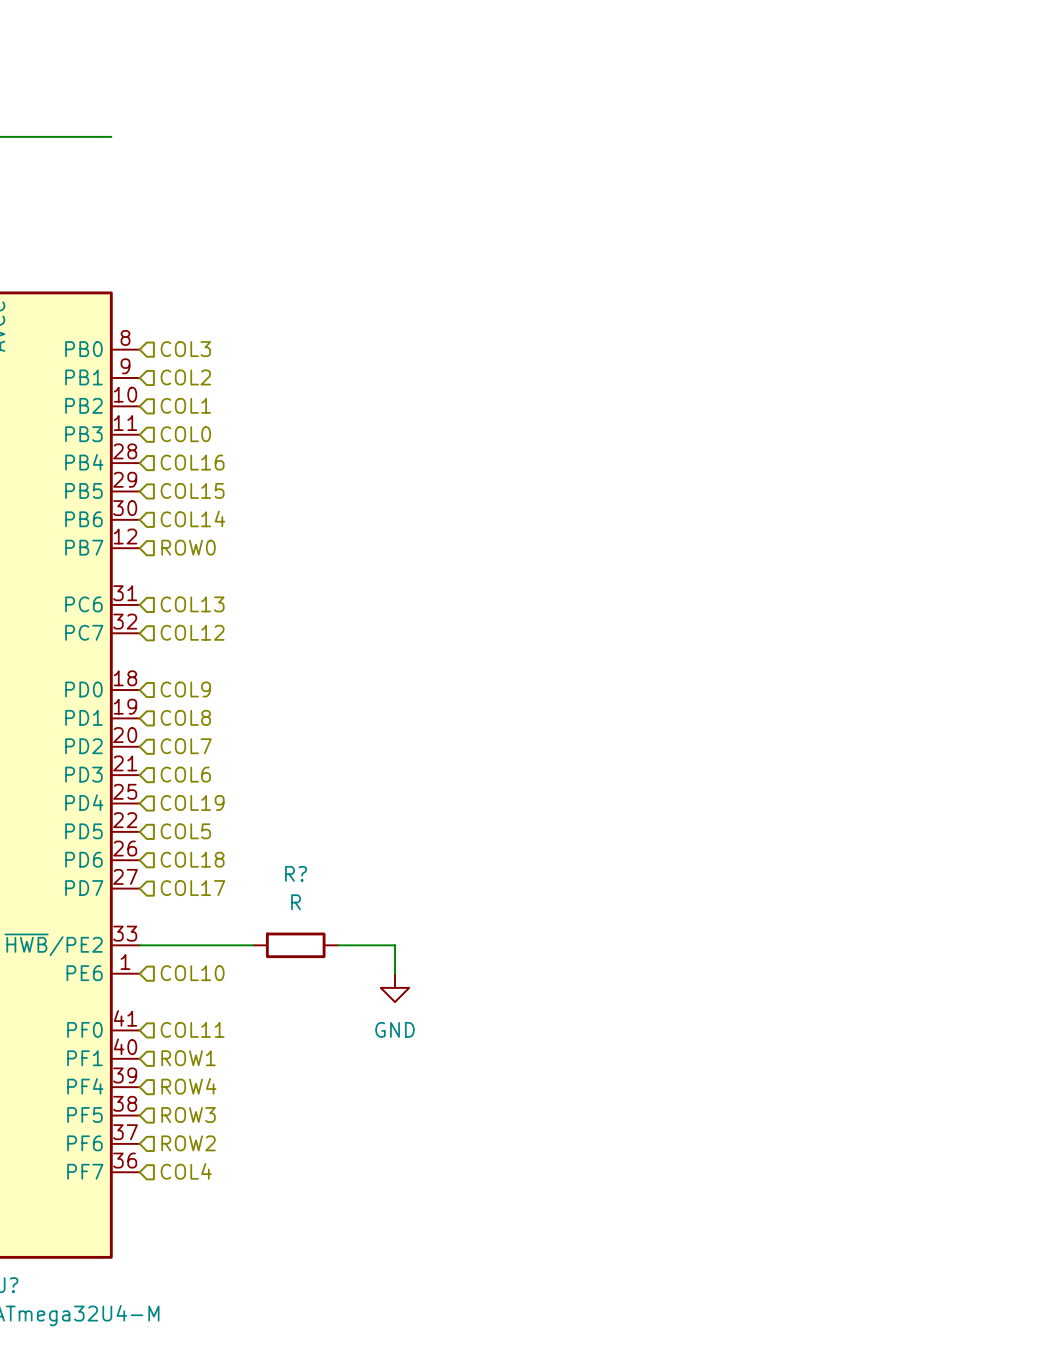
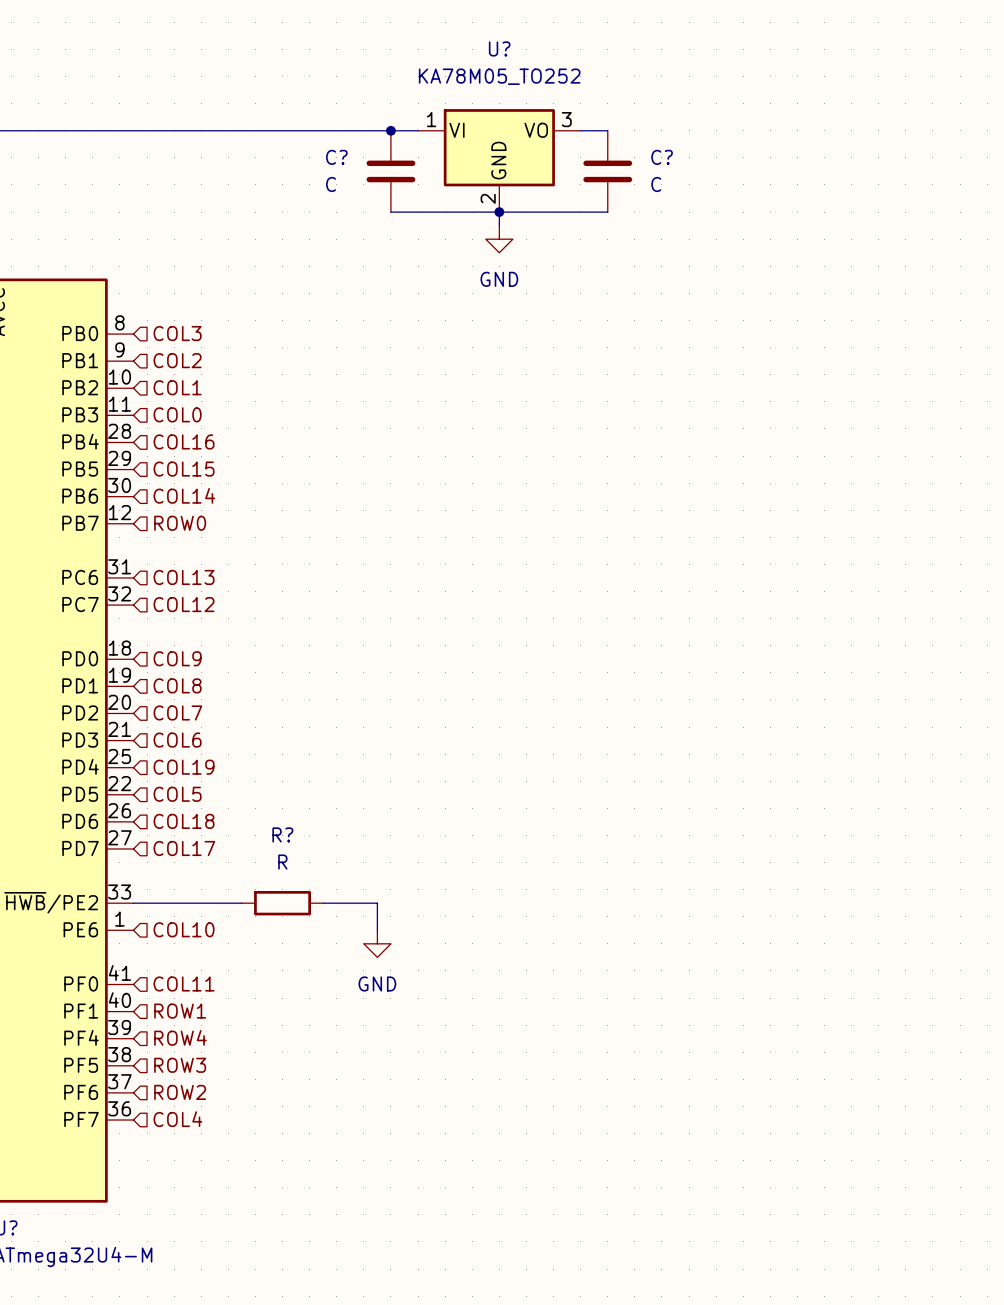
wire: none -> (106, 130) (418, 130)
junction: none -> (390, 130)
wire: none -> (580, 130) (607, 130)
U?: none -> KA78M05_TO252 (499, 160)
C?: none -> C (390, 171)
C?: none -> C (607, 171)
wire: none -> (390, 212) (607, 212)
wire: none -> (499, 212) (499, 225)
junction: none -> (499, 212)
power symbol: none -> GND (499, 239)

